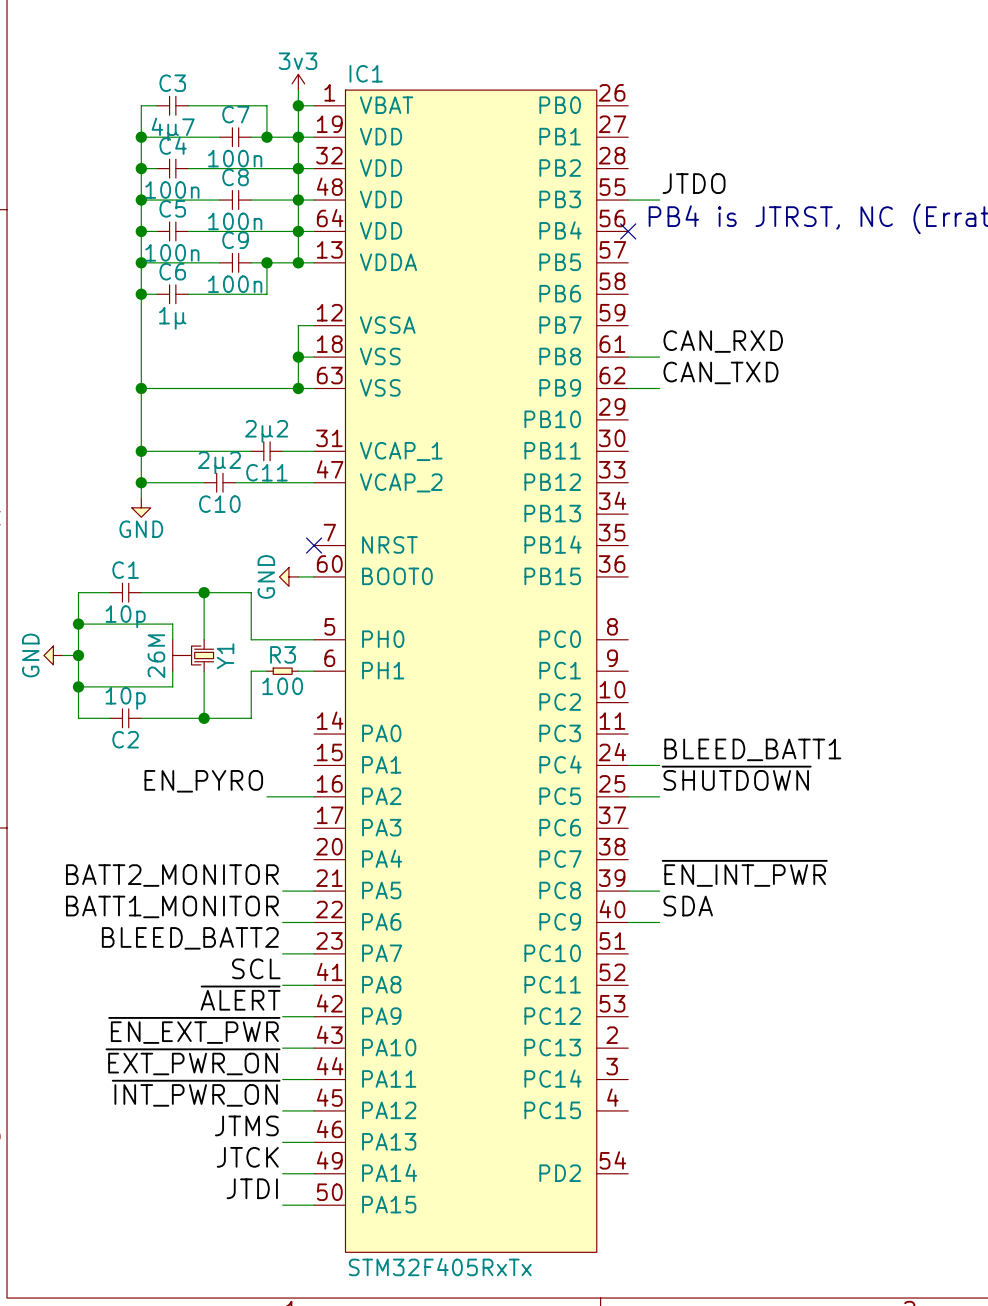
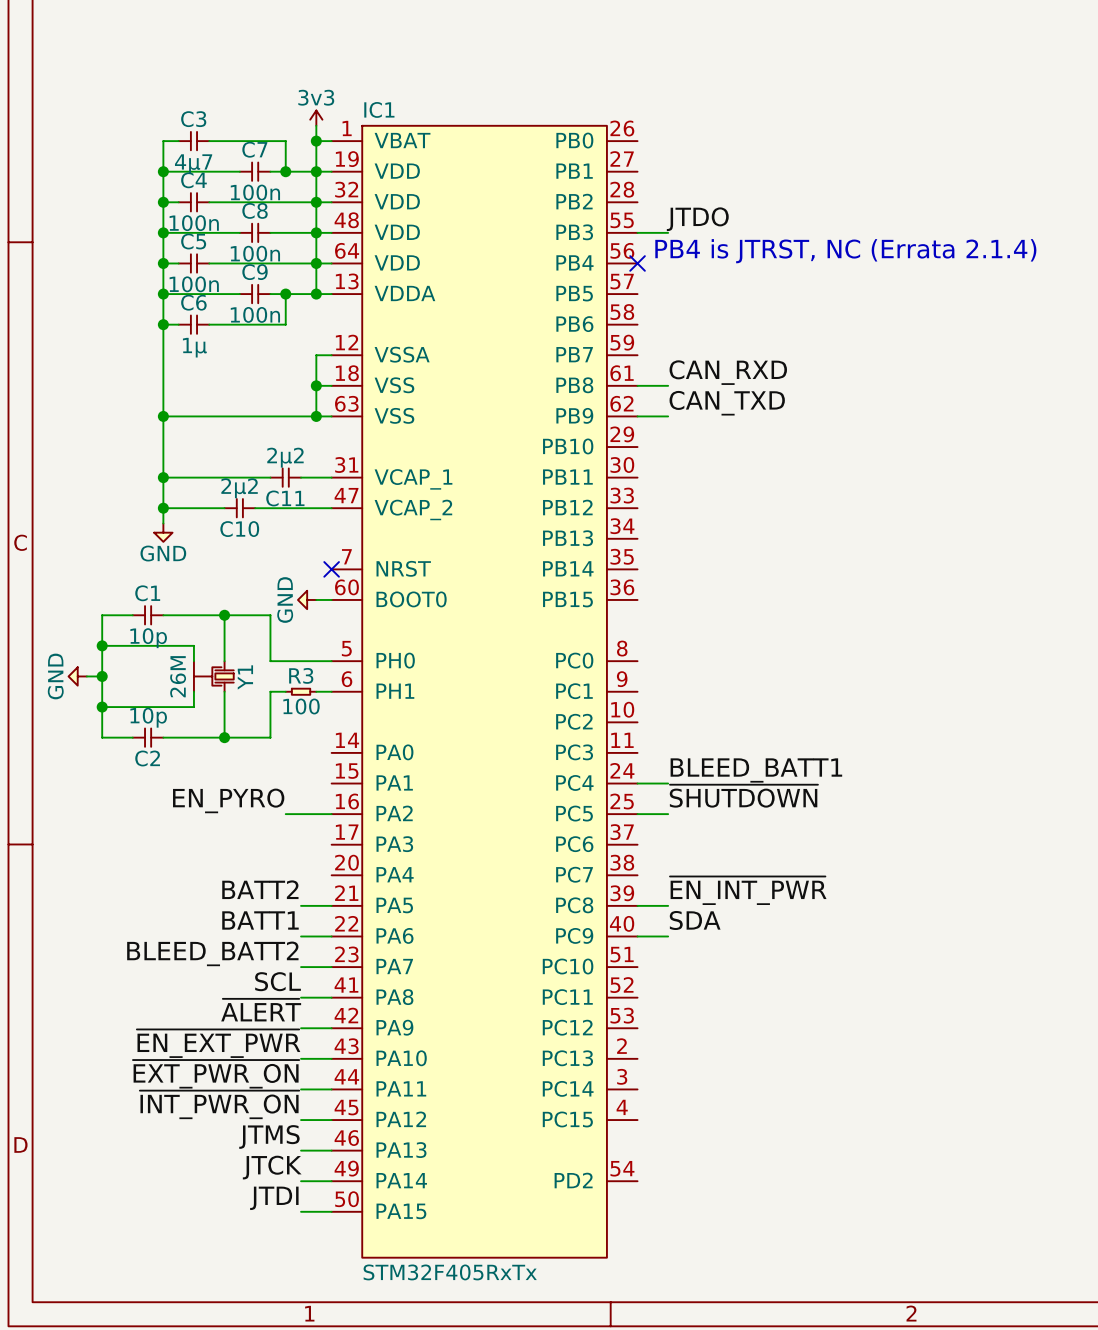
label: BATT2_MONITOR (172, 875) -> BATT2 (260, 889)
label: BATT1_MONITOR (172, 906) -> BATT1 (260, 920)

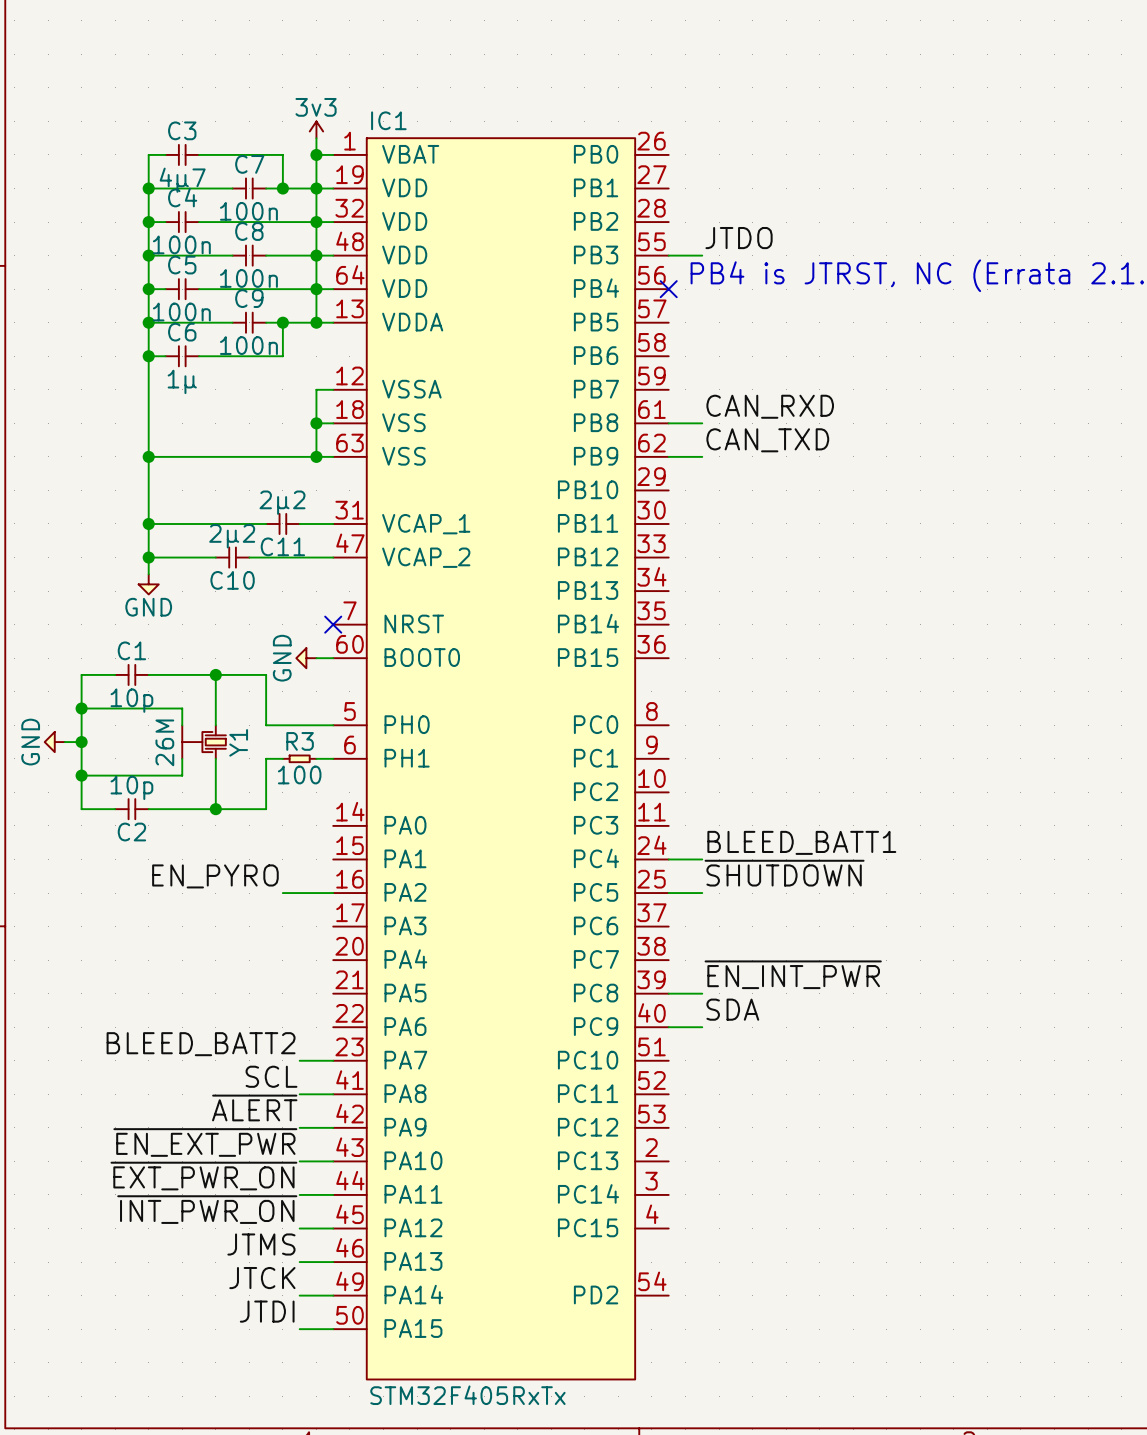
label: BATT2 (260, 889) -> none
wire: (301, 905) (331, 905) -> none
label: BATT1 (260, 920) -> none
wire: (301, 936) (331, 936) -> none

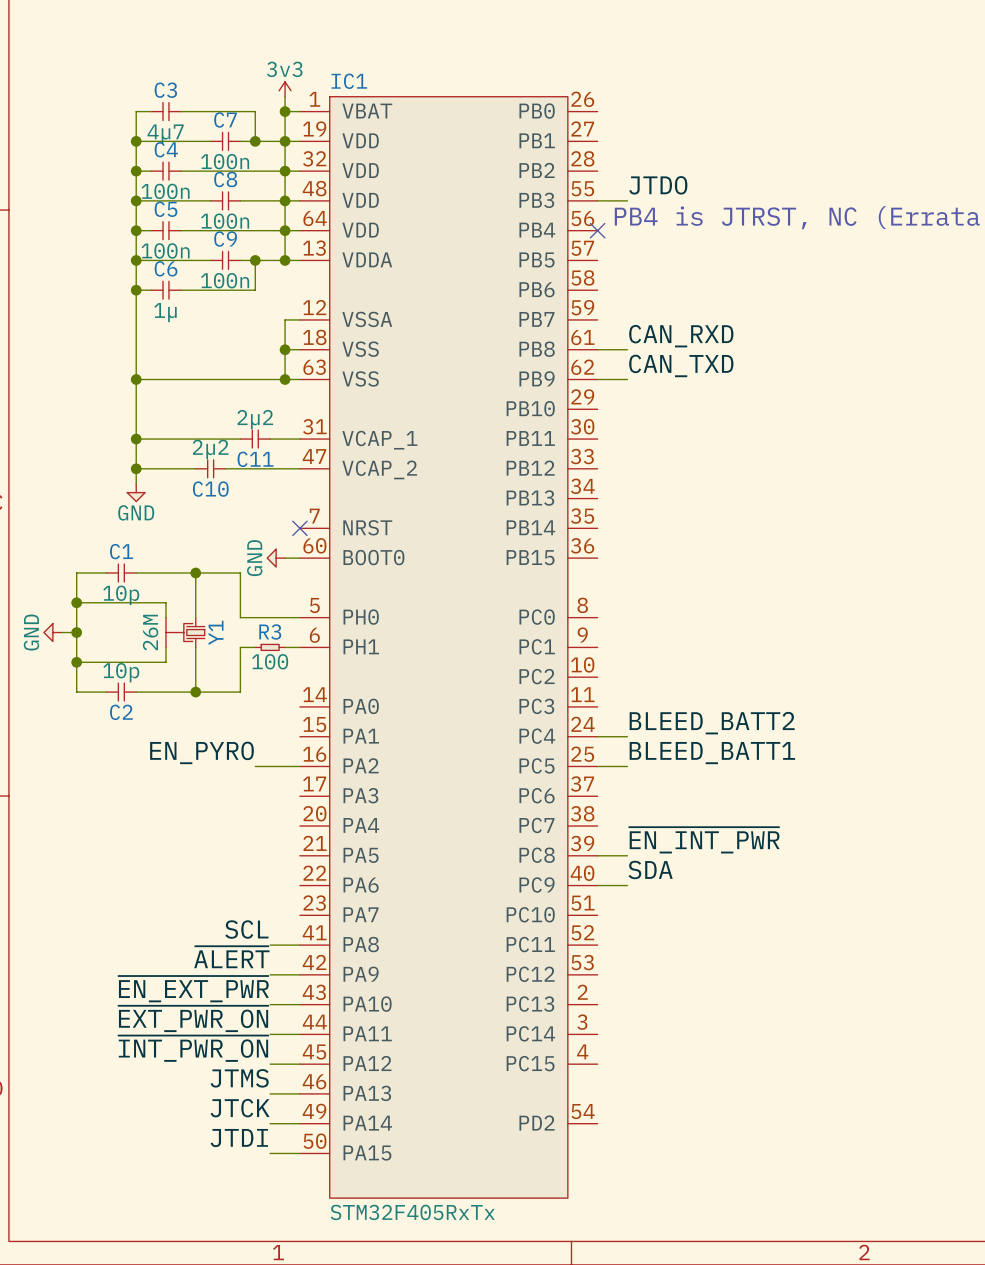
label: BLEED_BATT1 (801, 842) -> BLEED_BATT2 (712, 723)
label: ~{SHUTDOWN} (784, 873) -> BLEED_BATT1 (712, 753)
label: BLEED_BATT2 (201, 1044) -> none
wire: (299, 1060) (333, 1060) -> none

